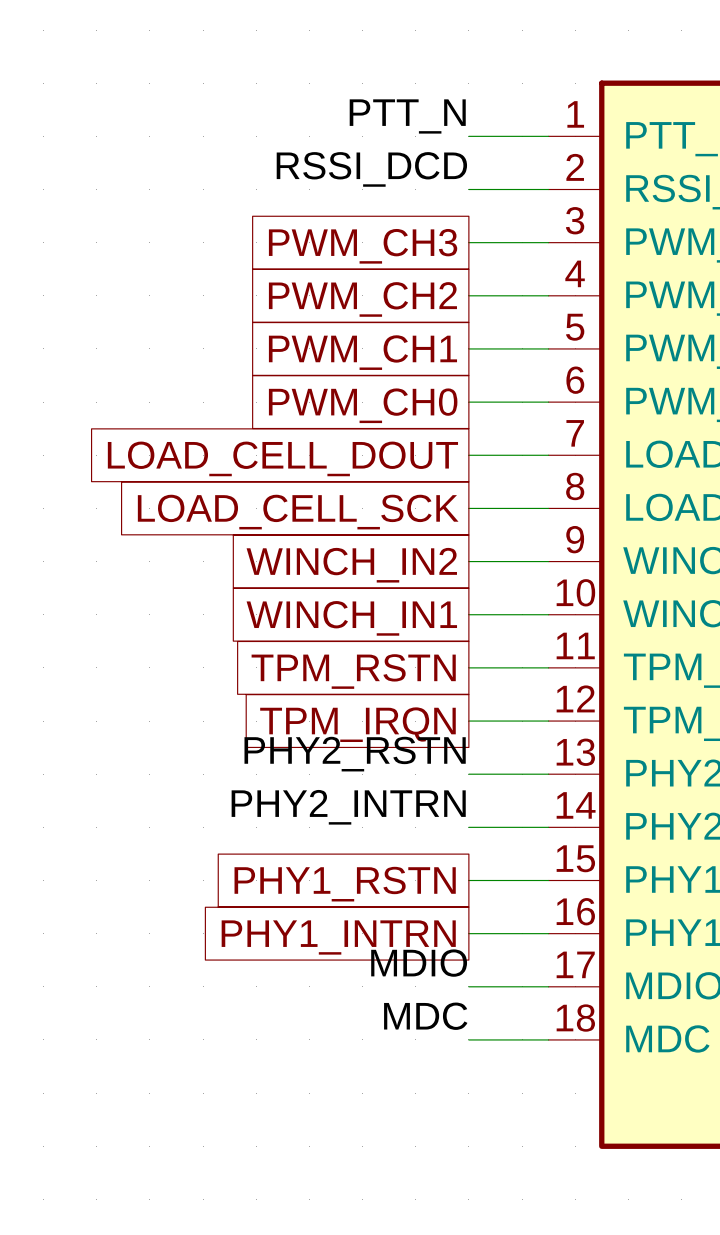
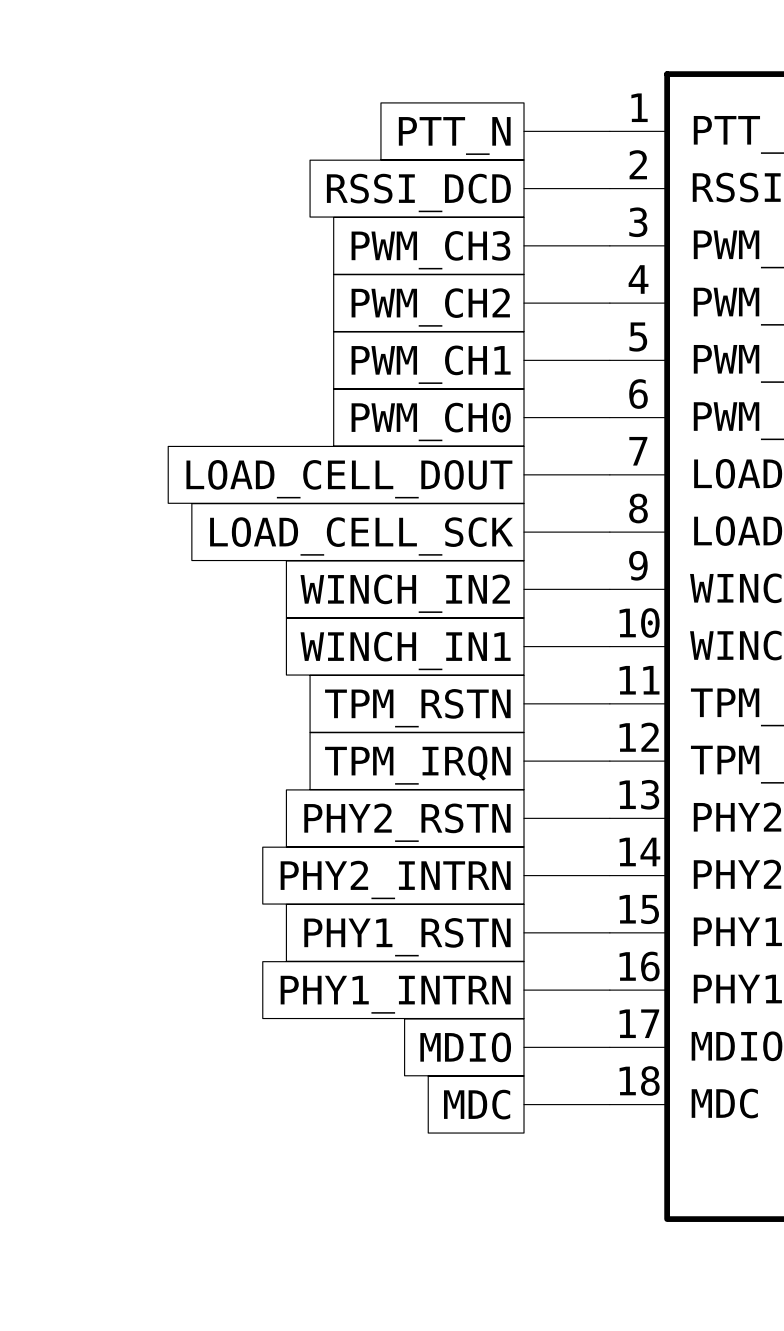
label: PTT_N (407, 116) -> none
global label: none -> PTT_N (454, 135)
label: RSSI_DCD (371, 169) -> none
global label: none -> RSSI_DCD (418, 192)
label: PHY2_RSTN (355, 754) -> none
global label: none -> PHY2_RSTN (407, 822)
label: PHY2_INTRN (348, 807) -> none
global label: none -> PHY2_INTRN (395, 879)
label: MDIO (419, 963) -> none
global label: none -> MDIO (465, 1047)
label: MDC (425, 1016) -> none
global label: none -> MDC (477, 1104)

